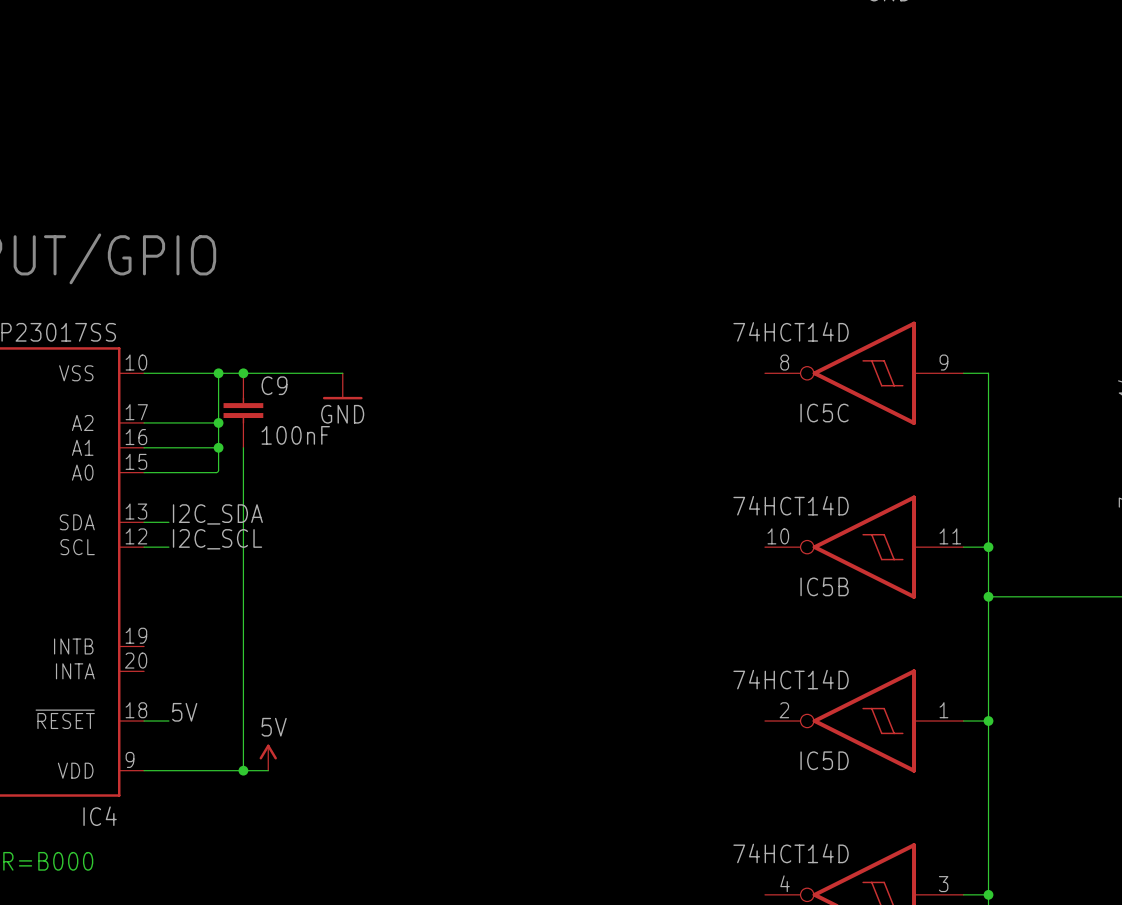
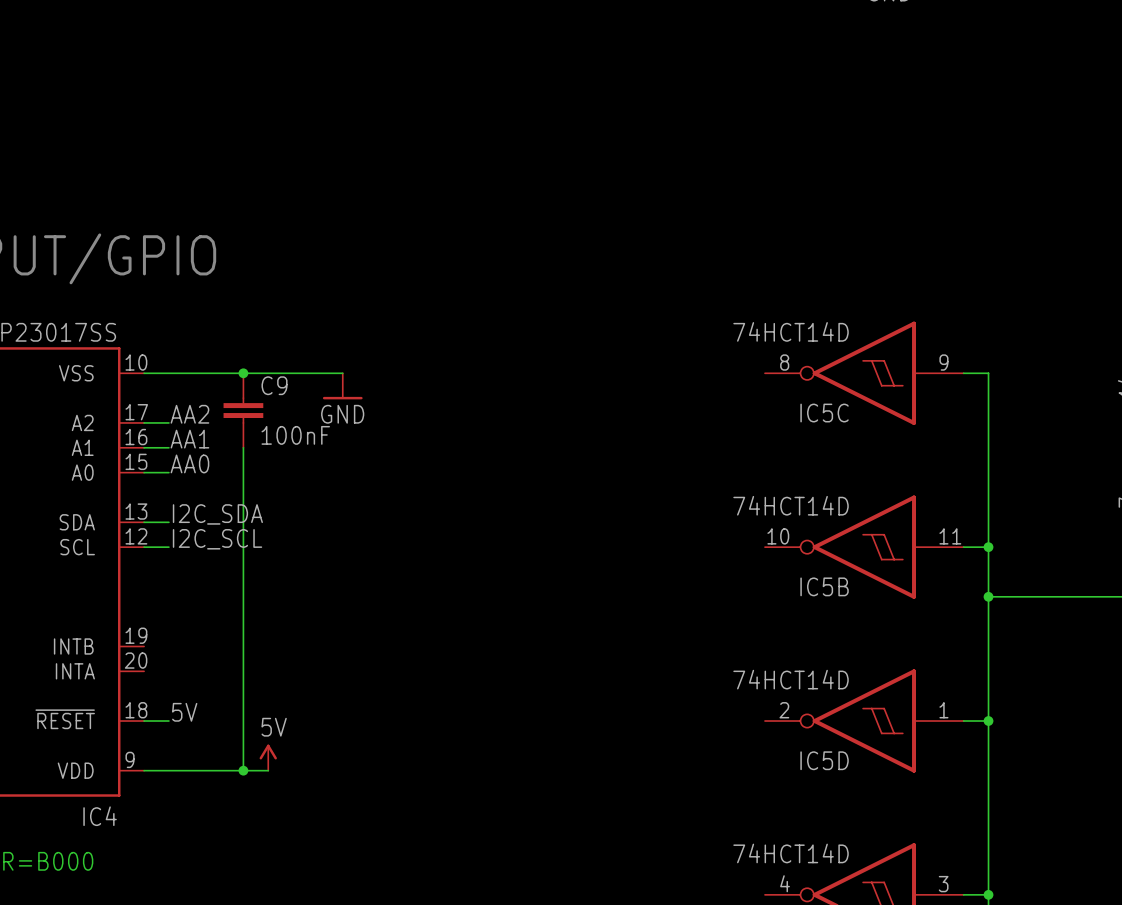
wire: (218, 373) (218, 471) (168, 472) -> none
junction: (218, 373) -> none
label: none -> AA2 (189, 414)
wire: (168, 422) (218, 422) -> none
junction: (218, 422) -> none
label: none -> AA1 (189, 439)
wire: (168, 447) (218, 447) -> none
junction: (218, 447) -> none
label: none -> AA0 (189, 463)

